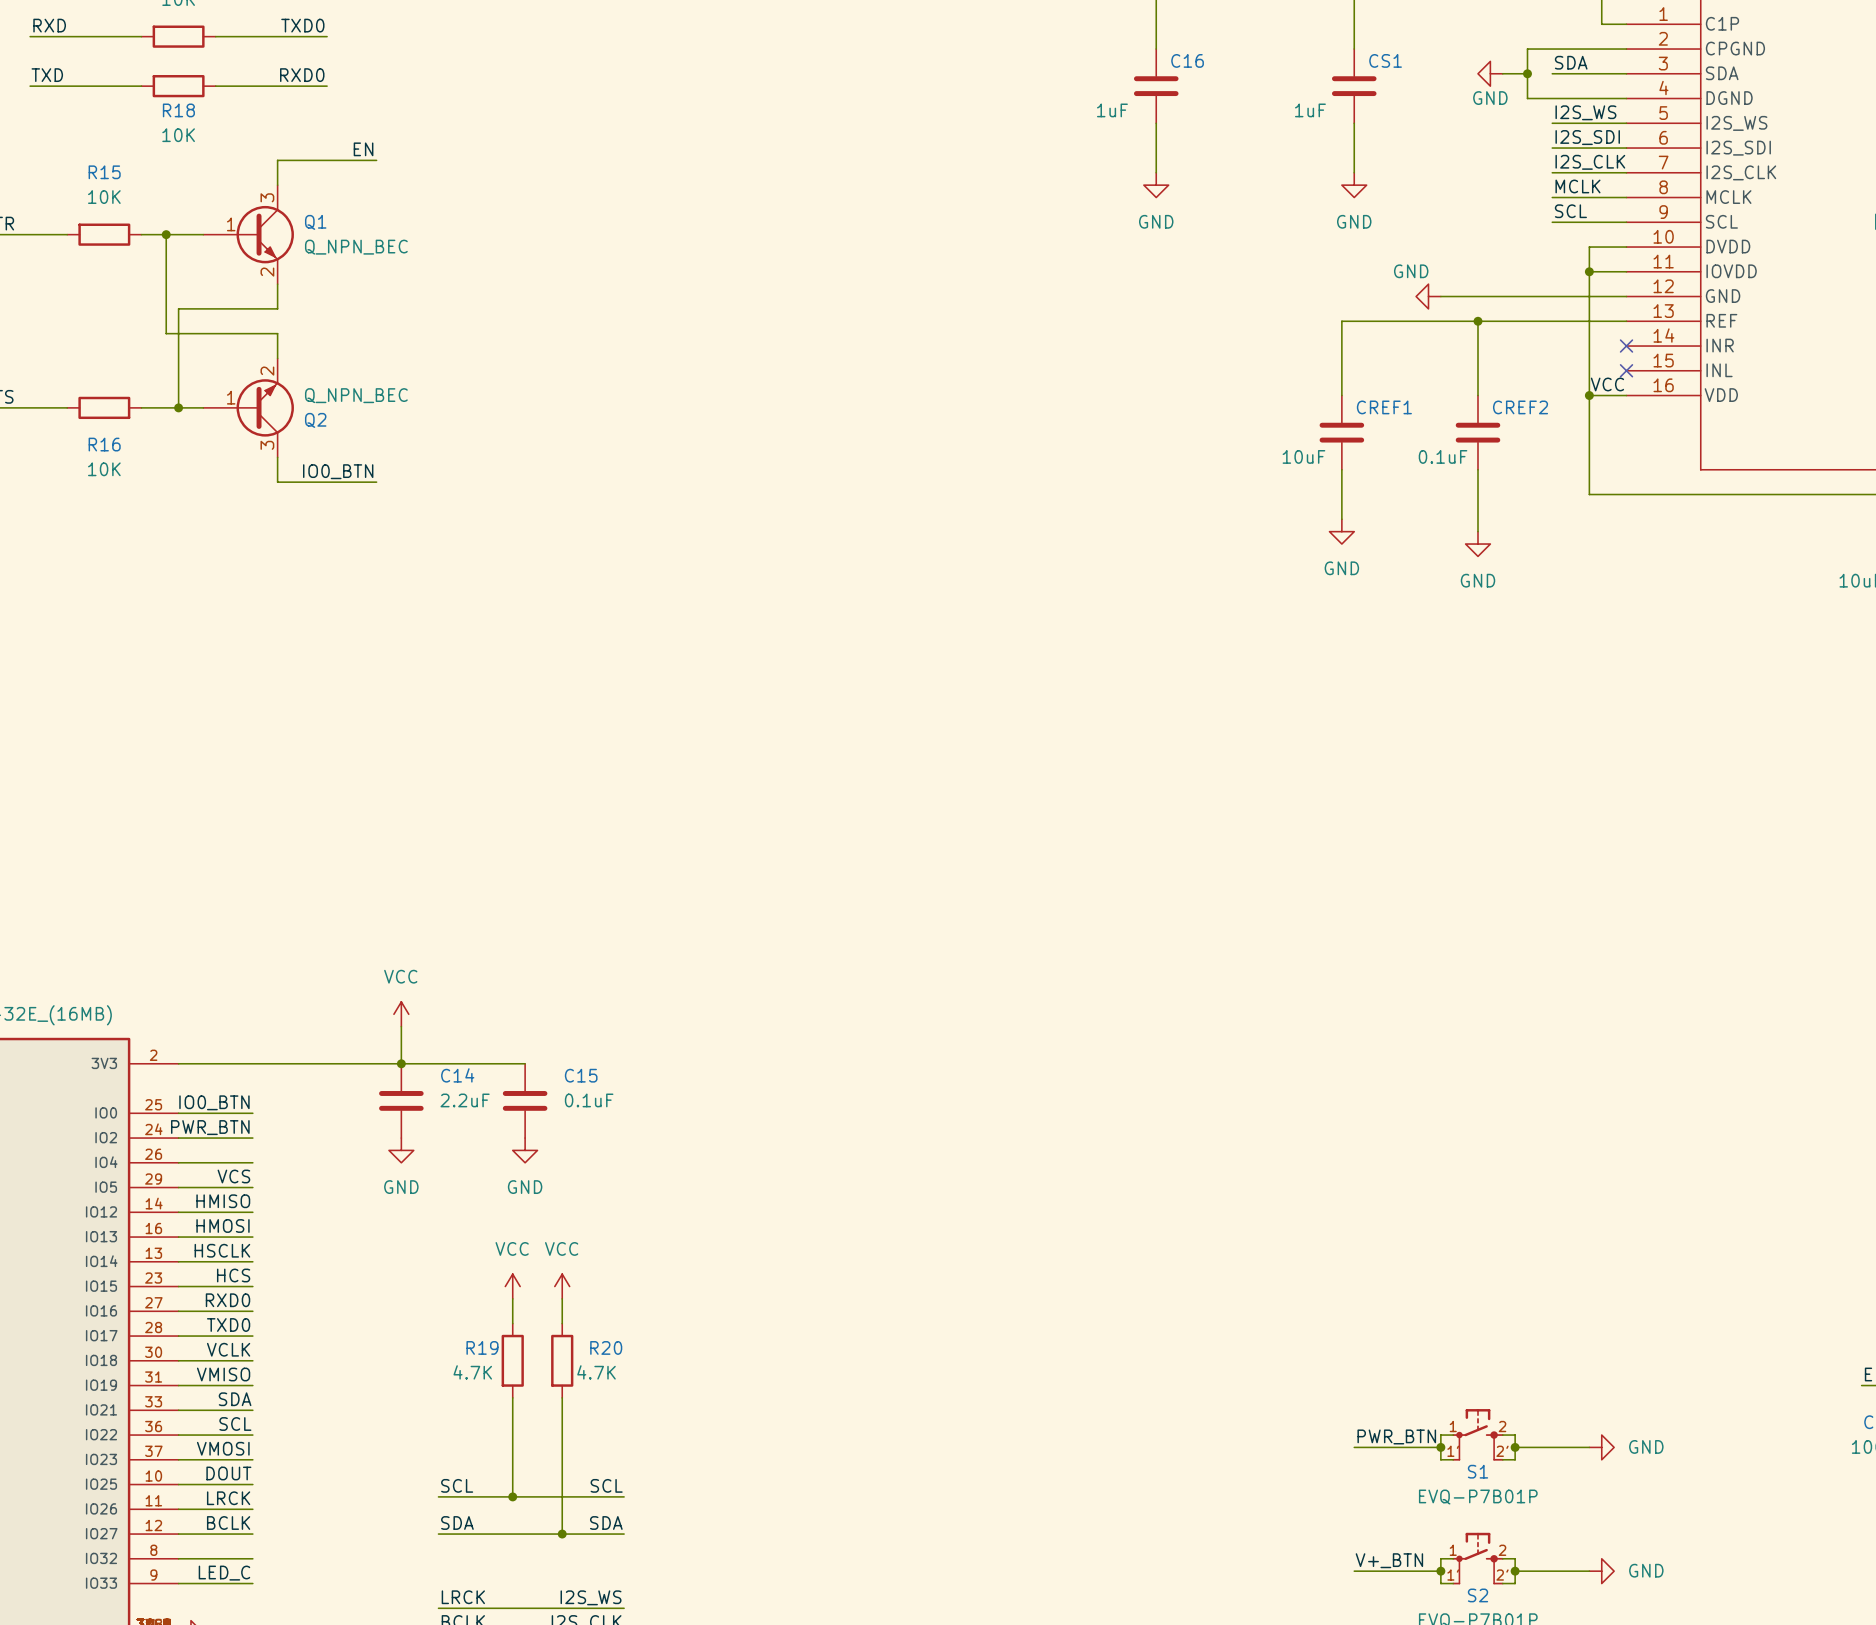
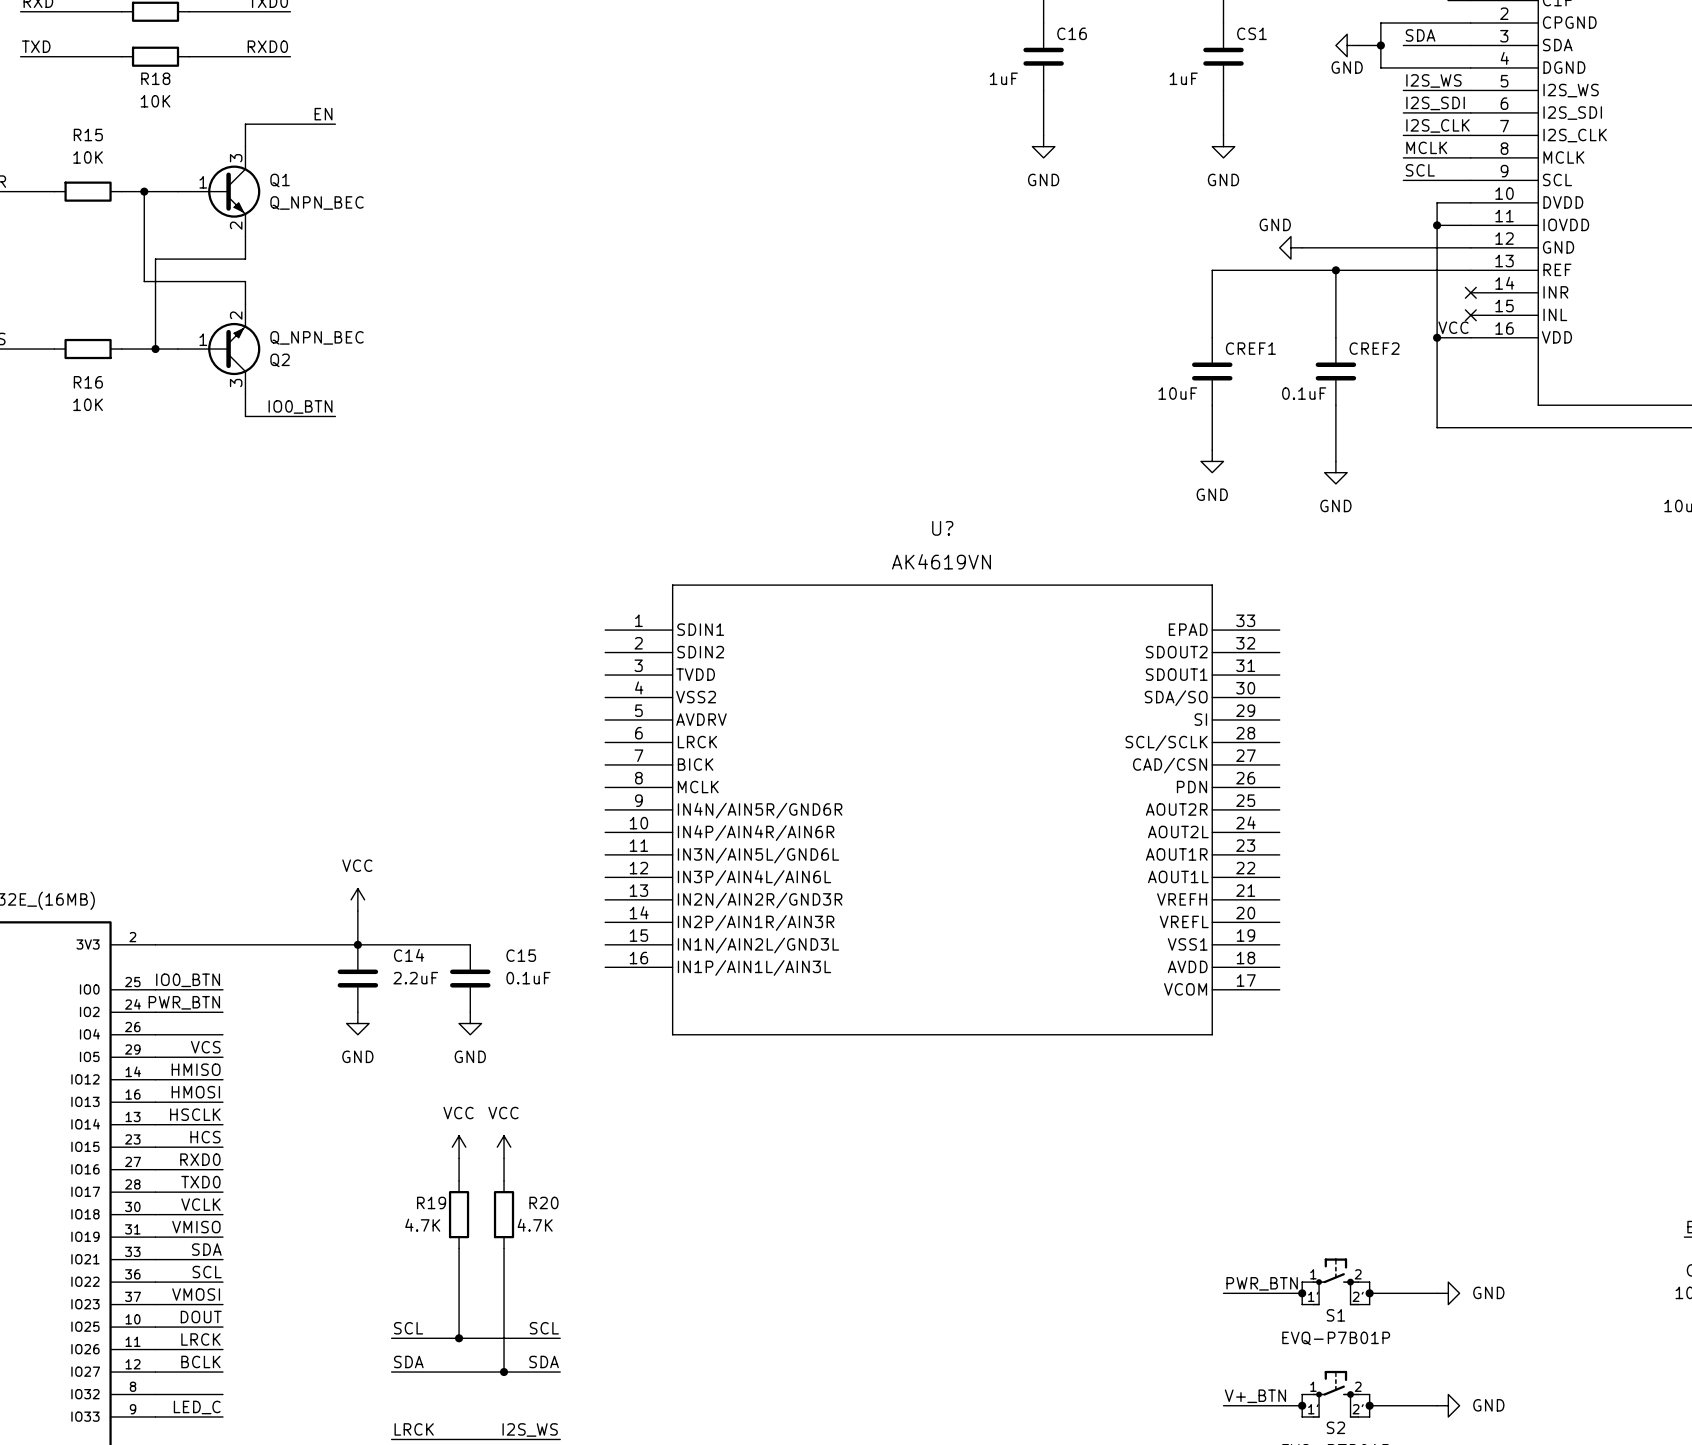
U?: none -> AK4619VN (942, 809)

